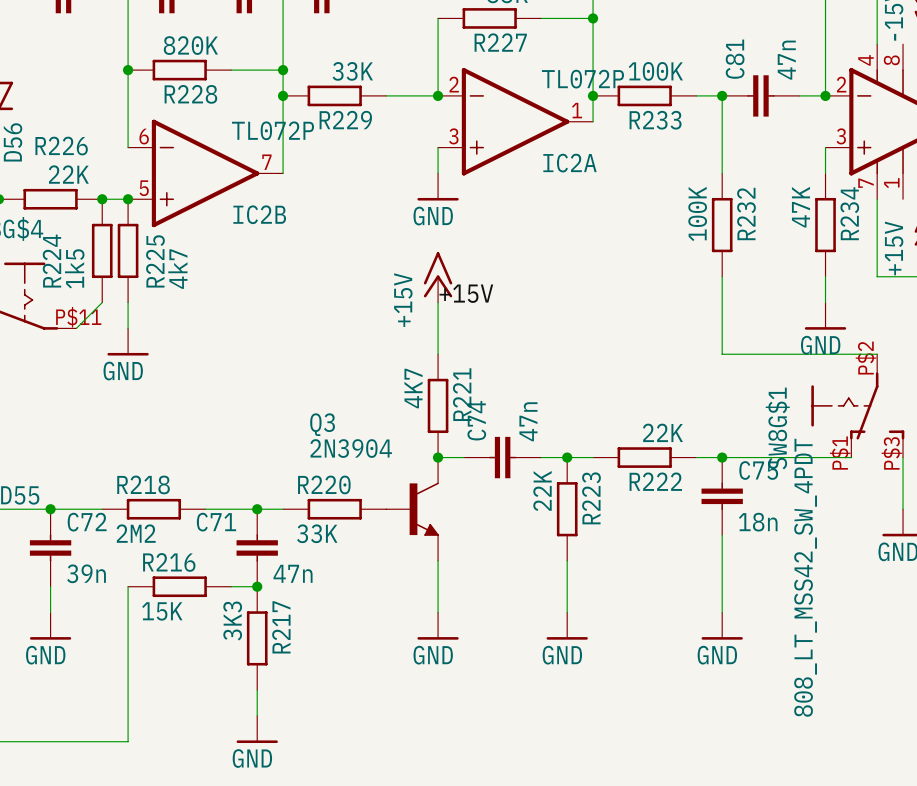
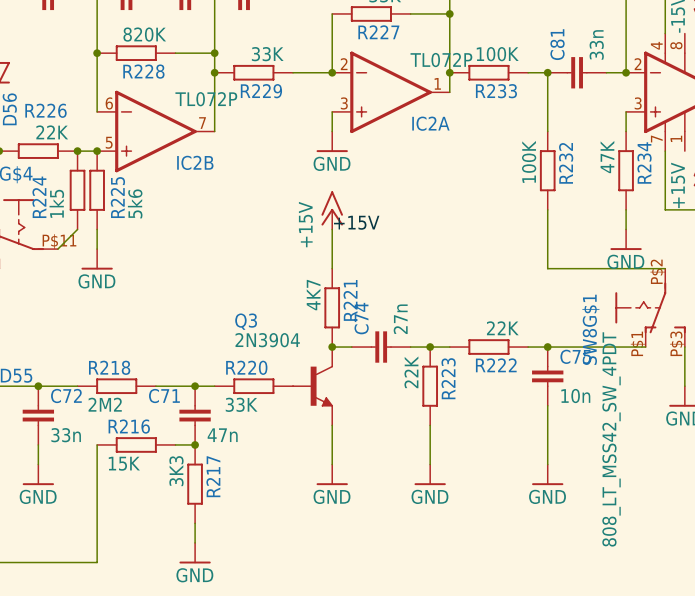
C81 value: 47n (786, 60) -> 33n (596, 44)
R225 value: 4k7 (177, 269) -> 5k6 (135, 203)
C74 value: 47n (528, 421) -> 27n (400, 319)
C75 value: 18n (758, 522) -> 10n (575, 396)
C72 value: 39n (86, 573) -> 33n (66, 435)

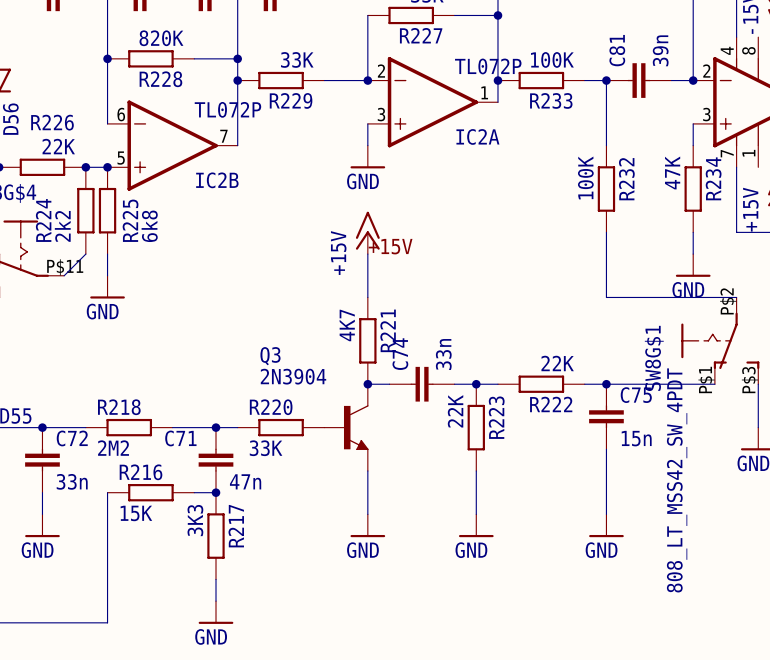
C81 value: 33n (596, 44) -> 39n (660, 50)
R224 value: 1k5 (56, 203) -> 2k2 (62, 226)
R225 value: 5k6 (135, 203) -> 6k8 (149, 226)
C74 value: 27n (400, 319) -> 33n (443, 354)
C75 value: 10n (575, 396) -> 15n (636, 438)

